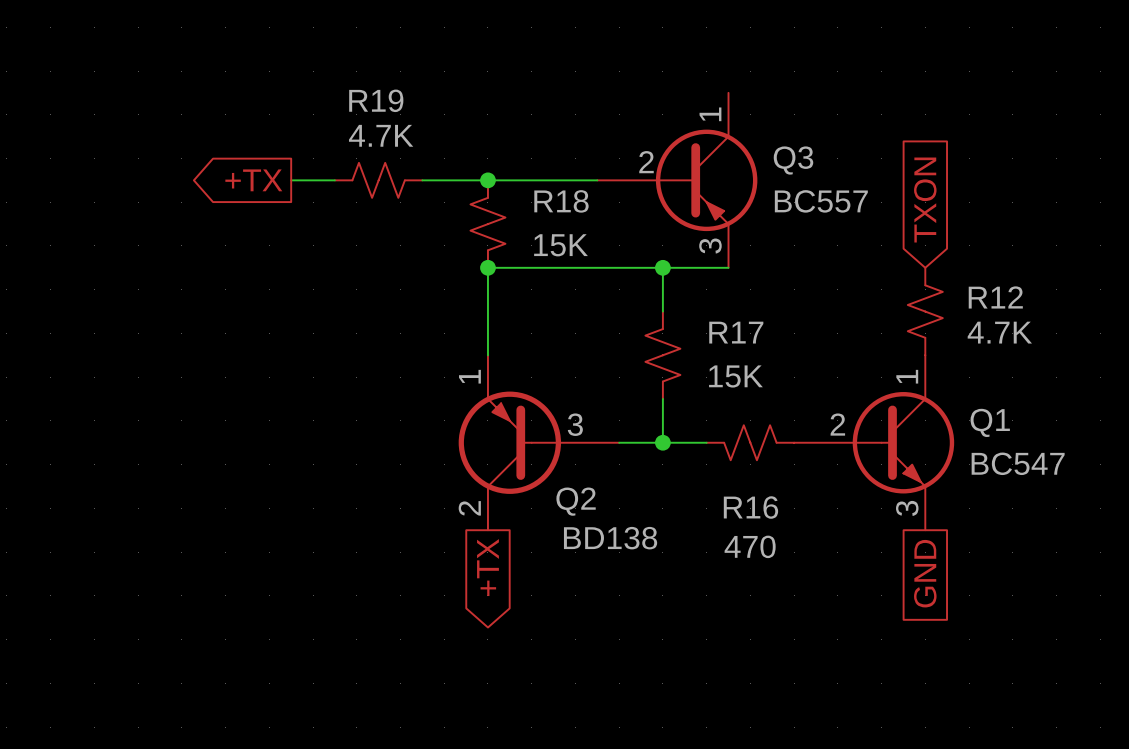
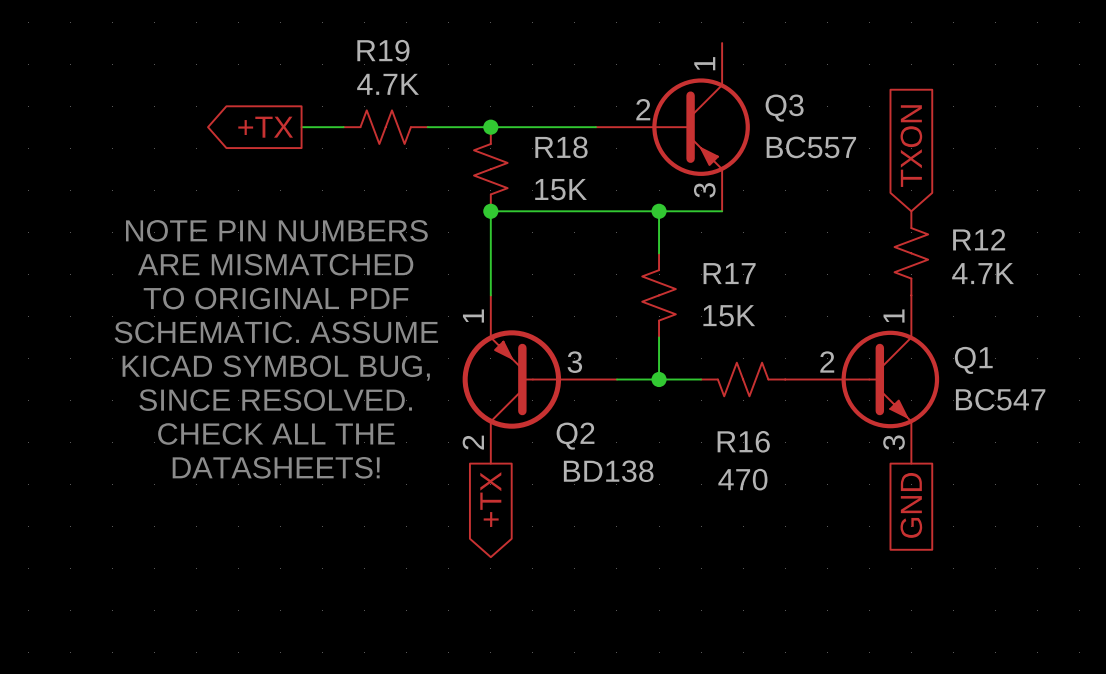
text: none -> NOTE PIN NUMBERS (276, 230)
text: none -> ARE MISMATCHED (275, 264)
text: none -> TO ORIGINAL PDF (276, 298)
text: none -> SCHEMATIC. ASSUME (276, 332)
text: none -> KICAD SYMBOL BUG, (276, 368)
text: none -> SINCE RESOLVED. (275, 400)
text: none -> CHECK ALL THE (276, 433)
text: none -> DATASHEETS! (276, 467)

